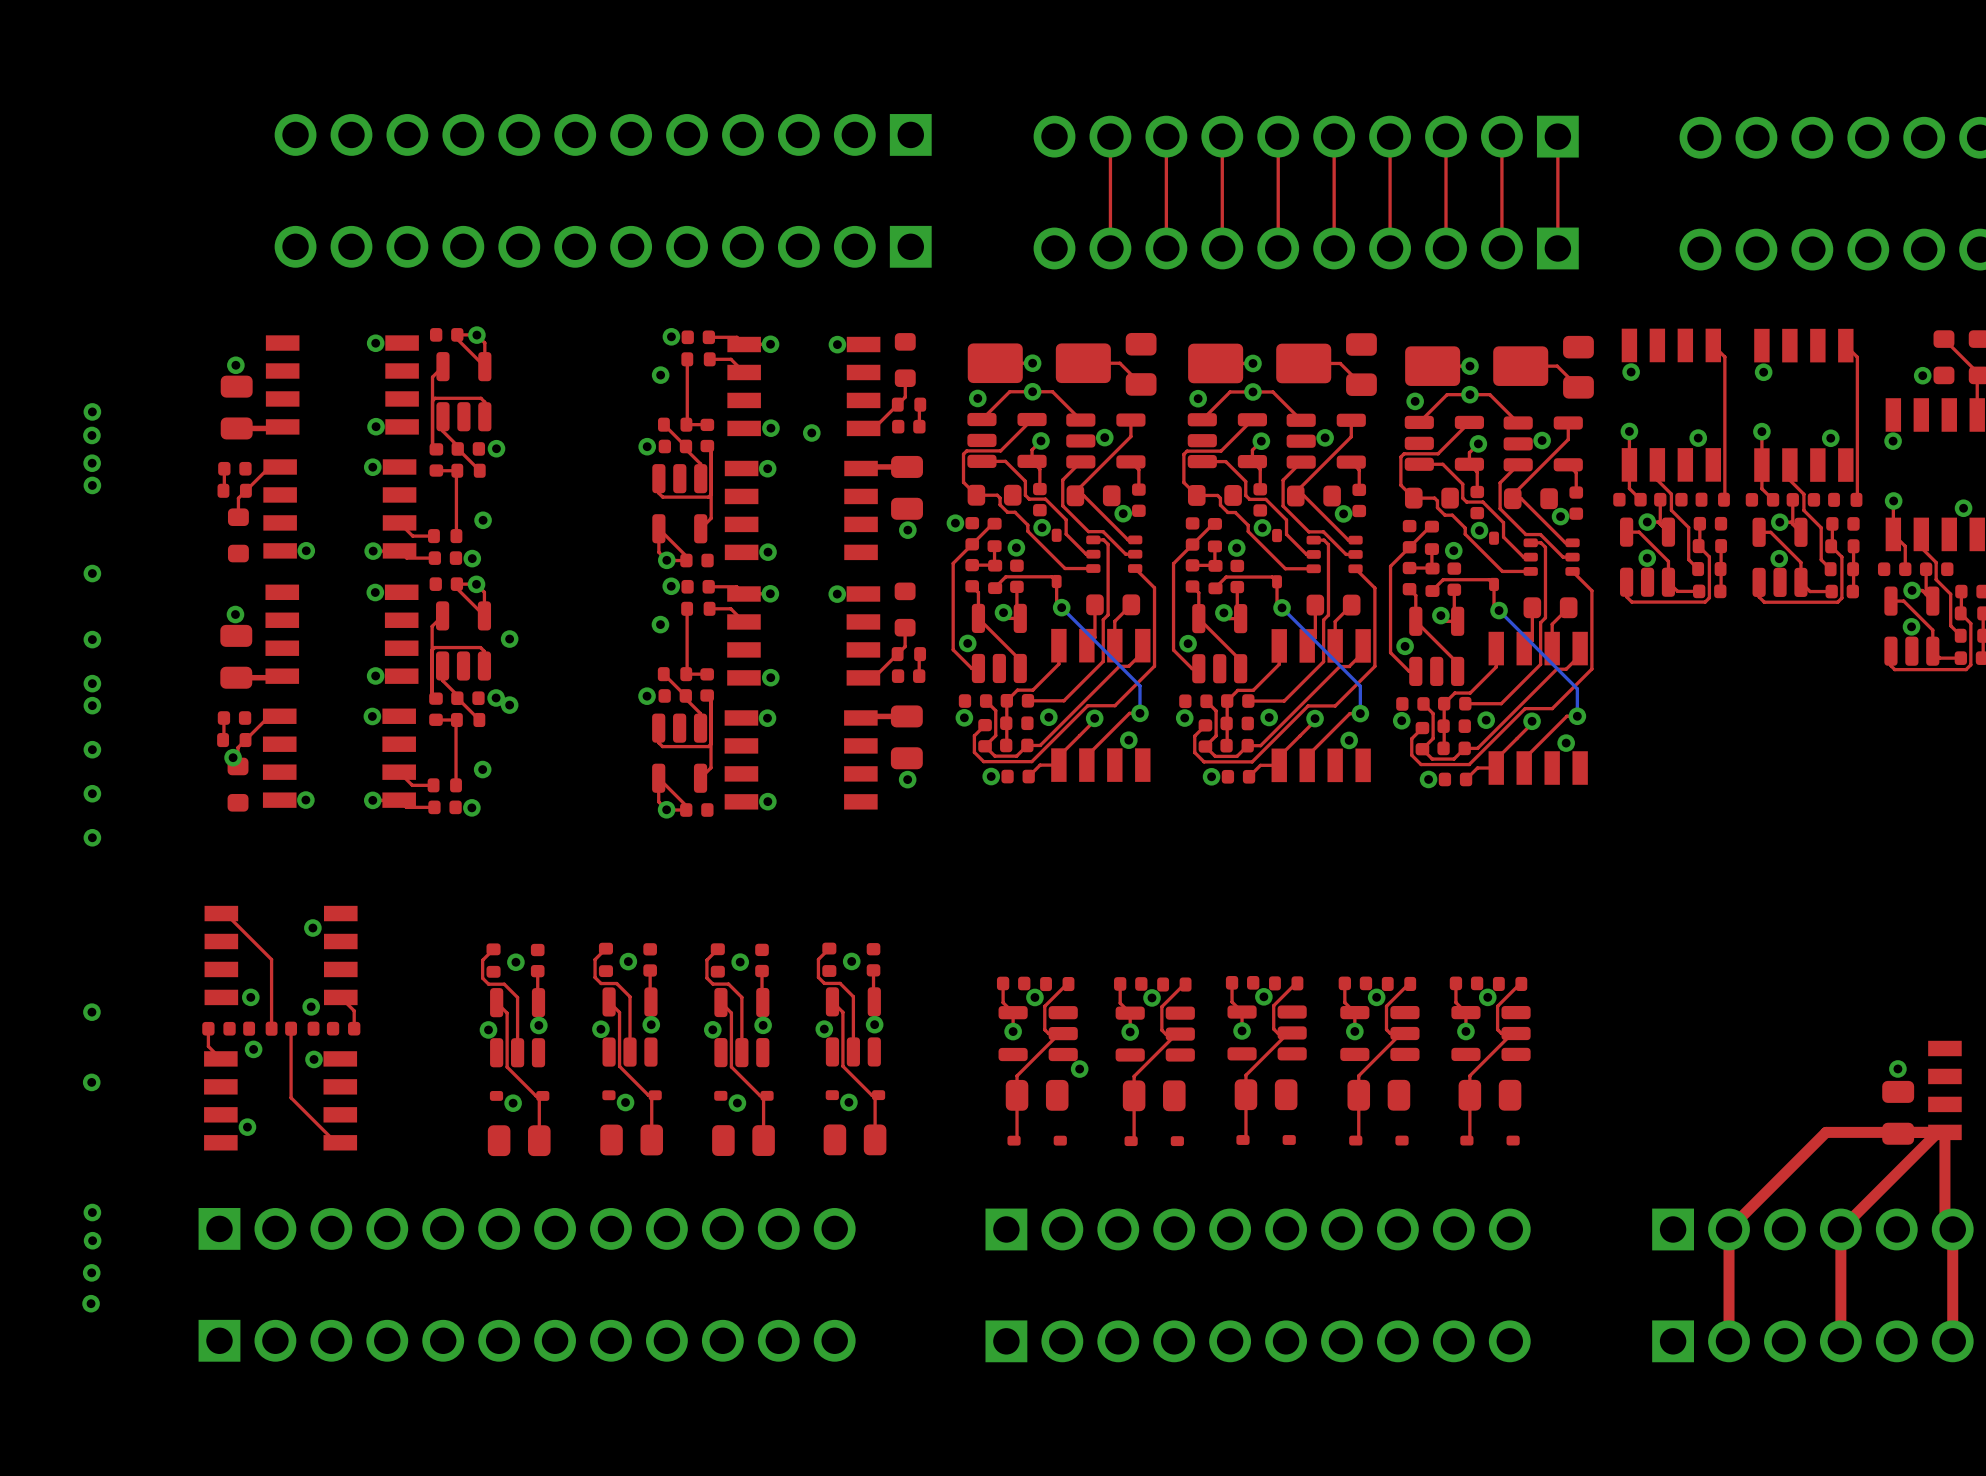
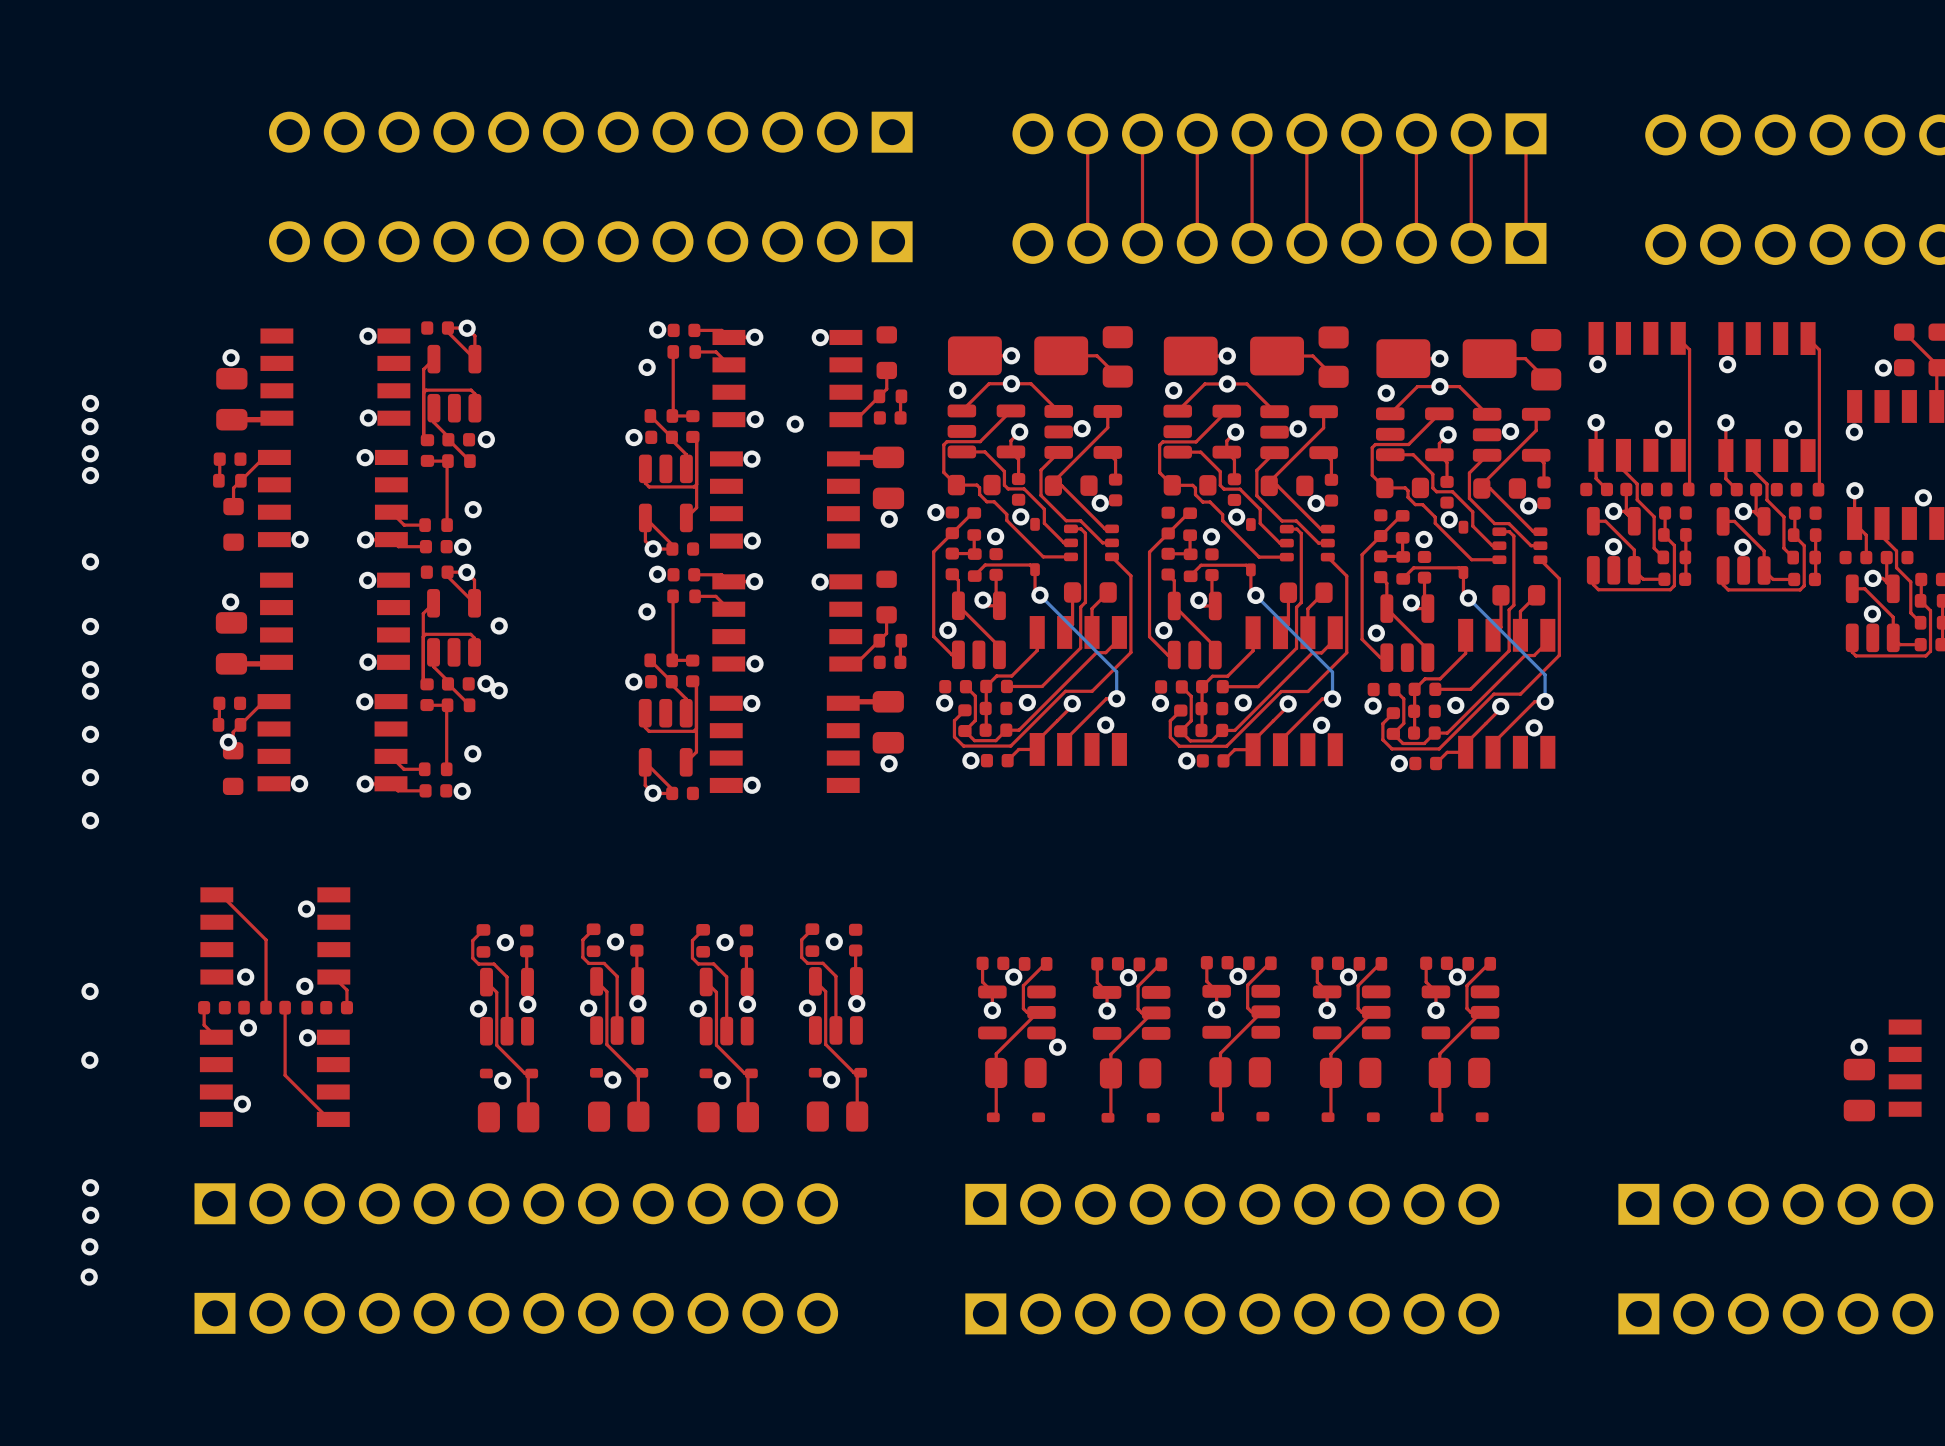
top track: (1937, 1132) (1840, 1229) (1840, 1341) -> none
top track: (1952, 1341) (1952, 1229) (1944, 1221) (1944, 1132) (1826, 1132) (1729, 1229) (1729, 1341) -> none

